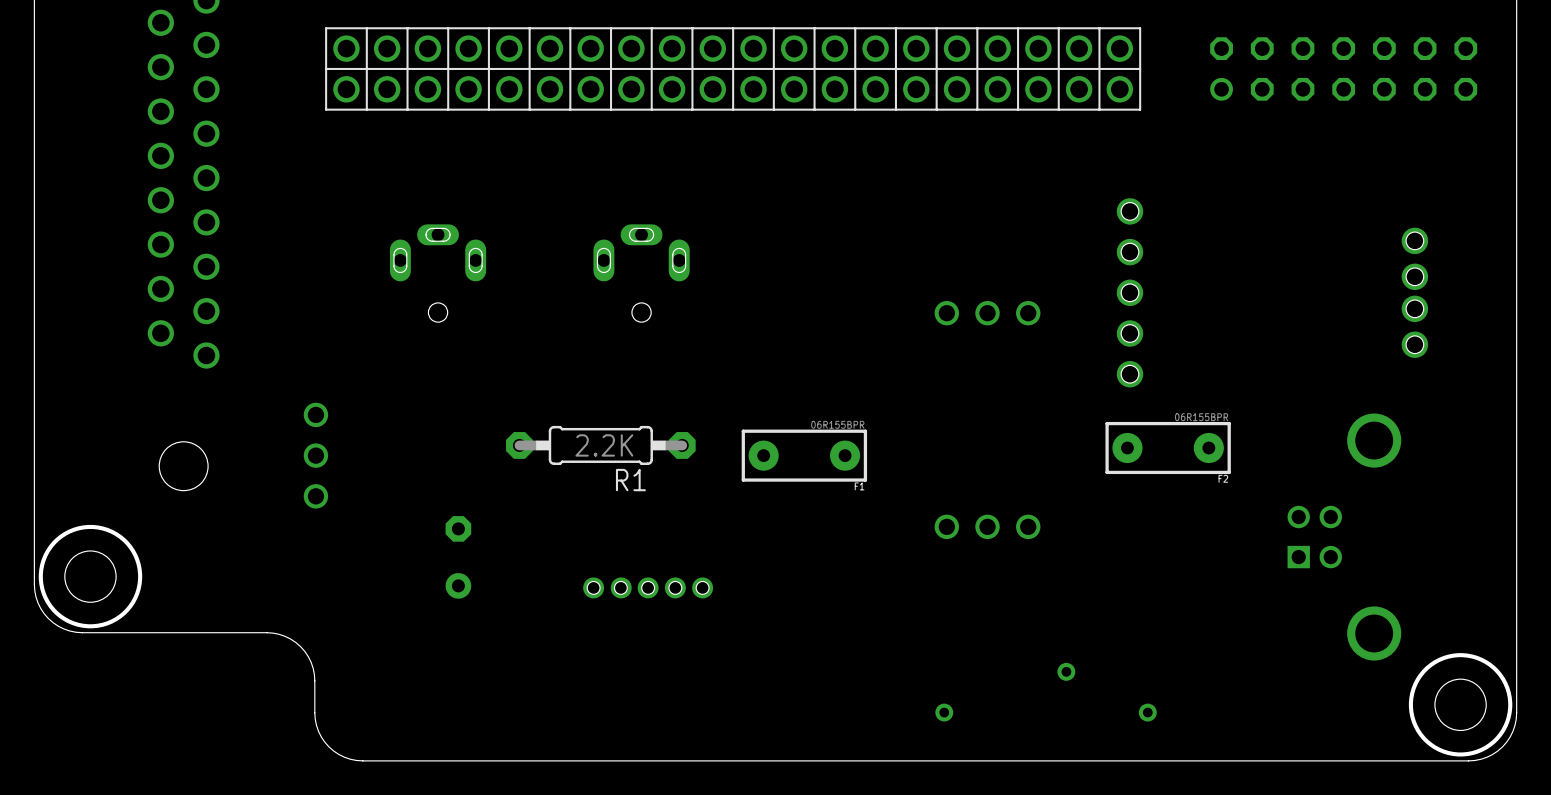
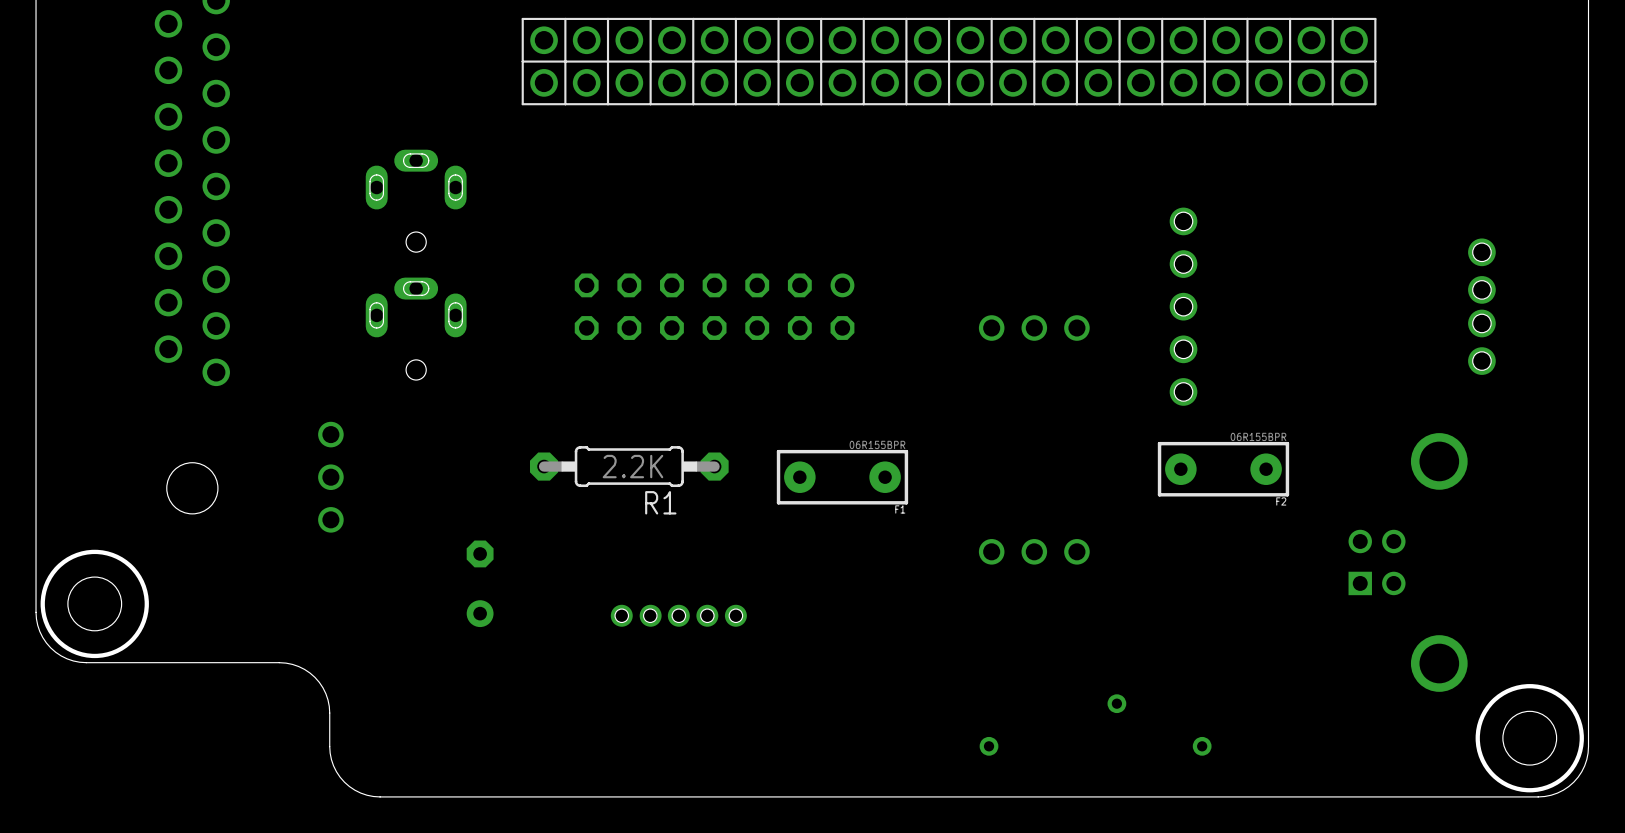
part position: (733, 68) -> (949, 61)
part: (1343, 68) -> none
part: none -> (416, 200)
part: (438, 273) -> none
part: (641, 273) -> none
part: none -> (714, 306)
part: none -> (416, 328)

